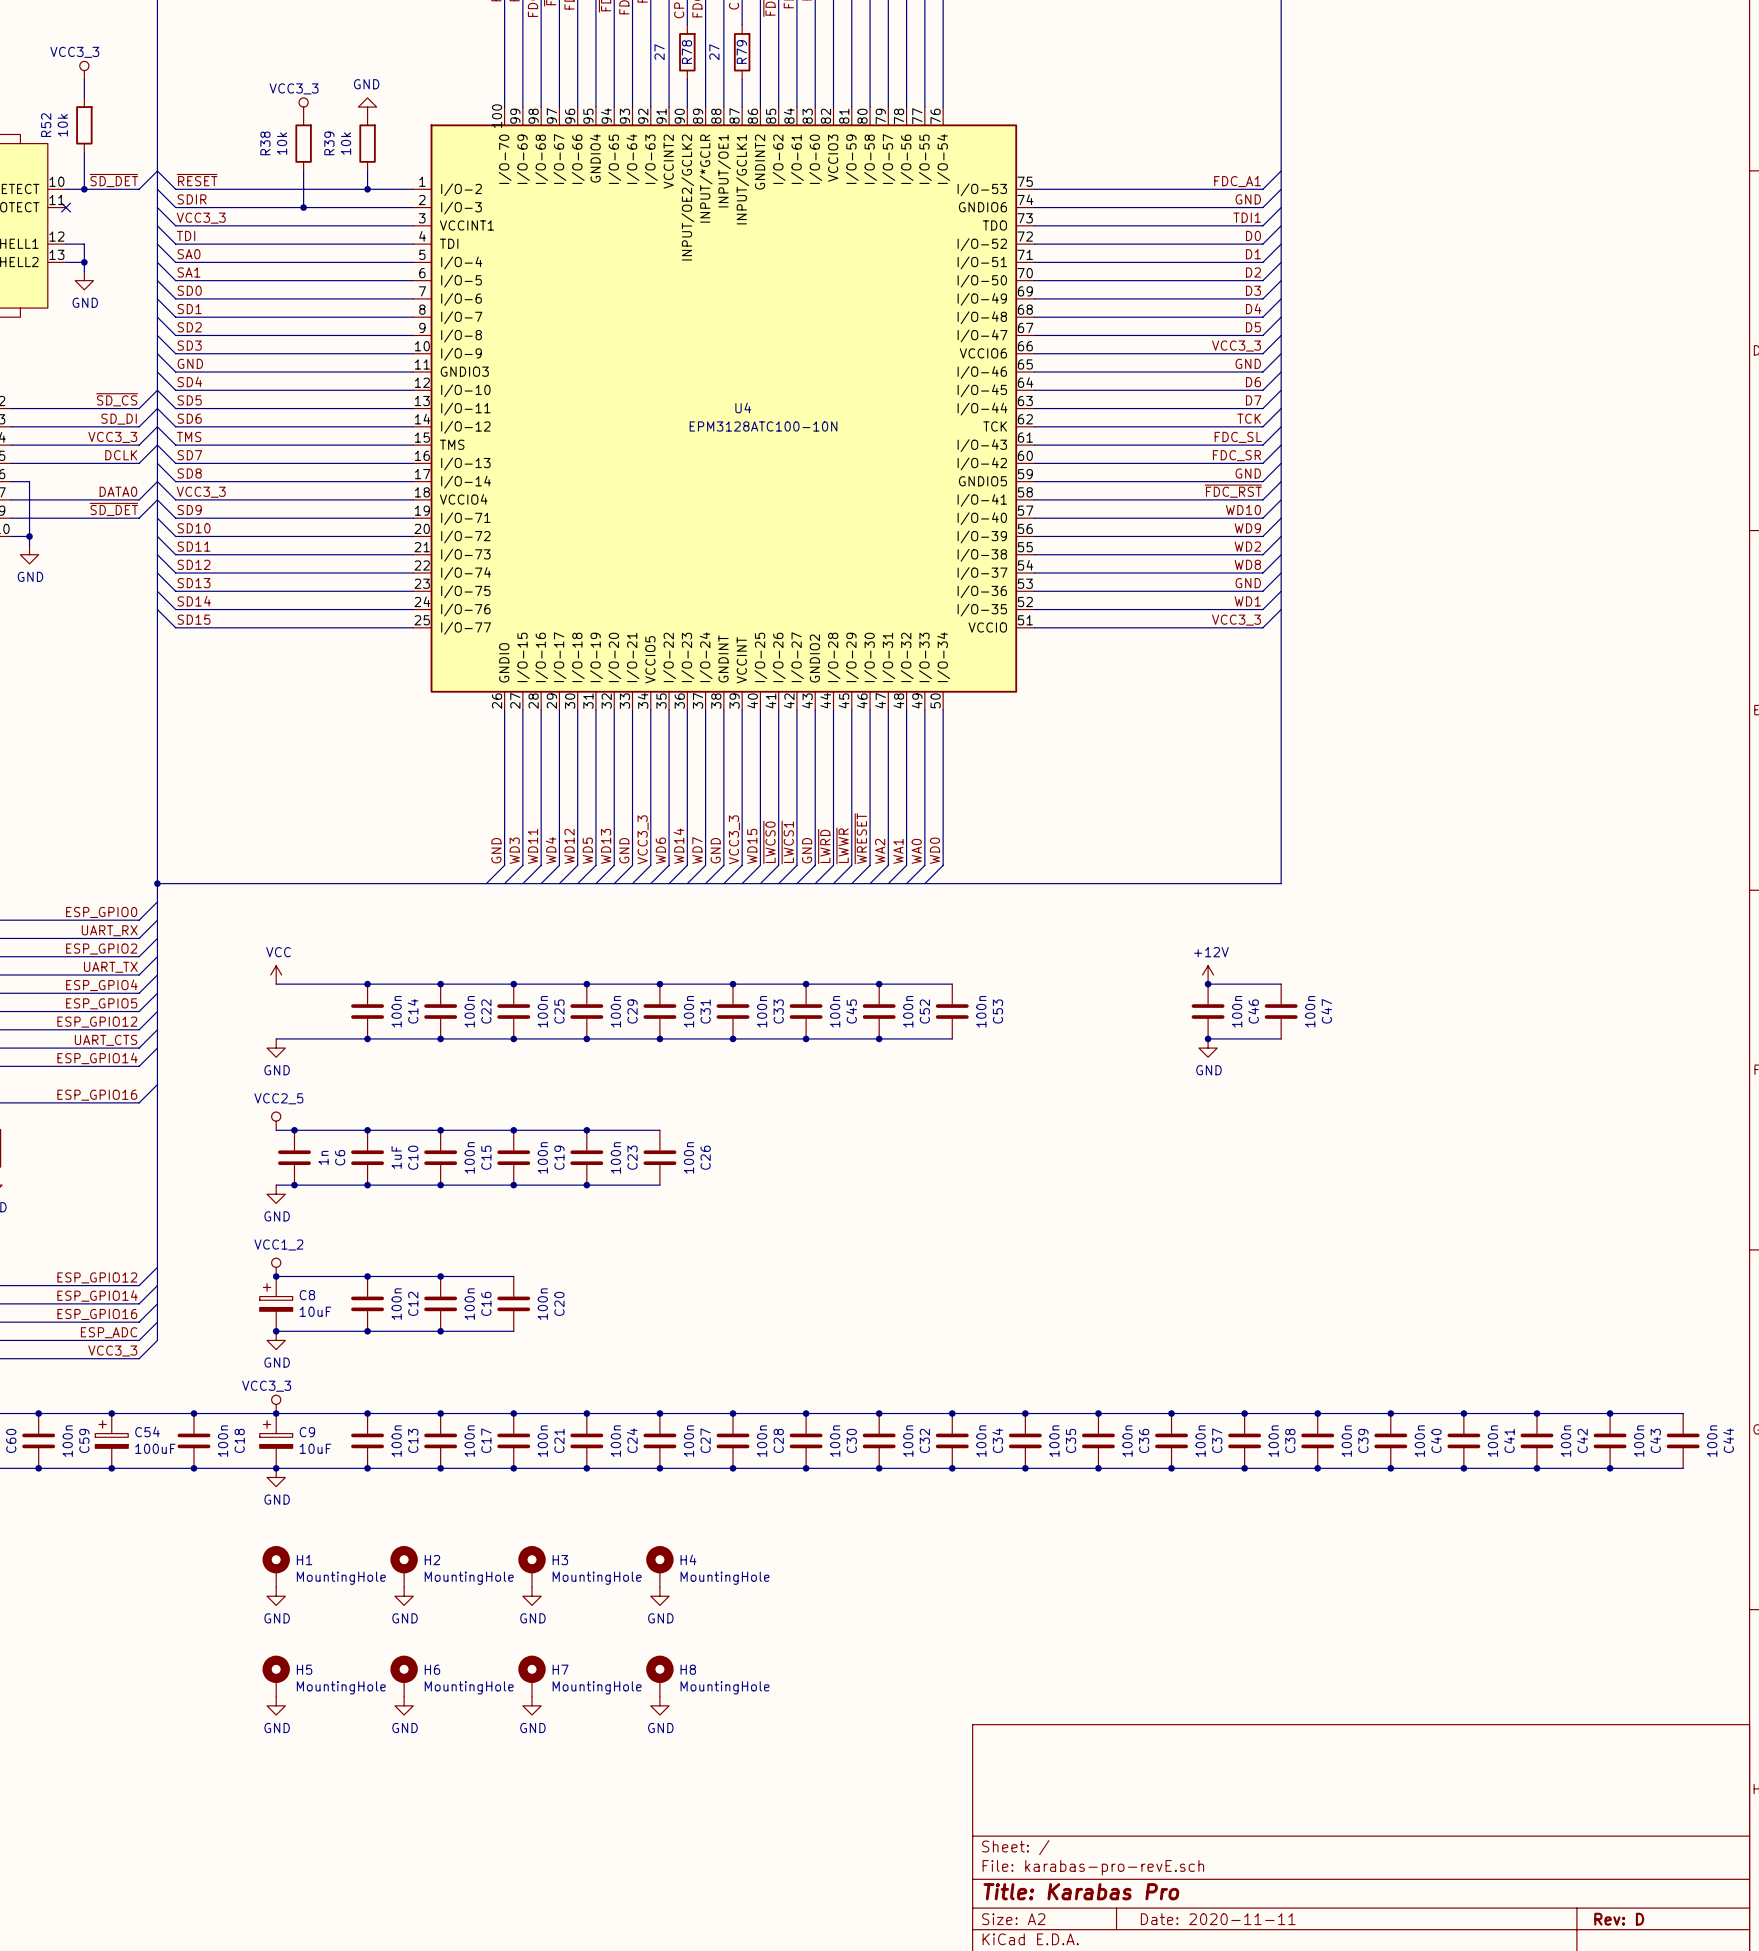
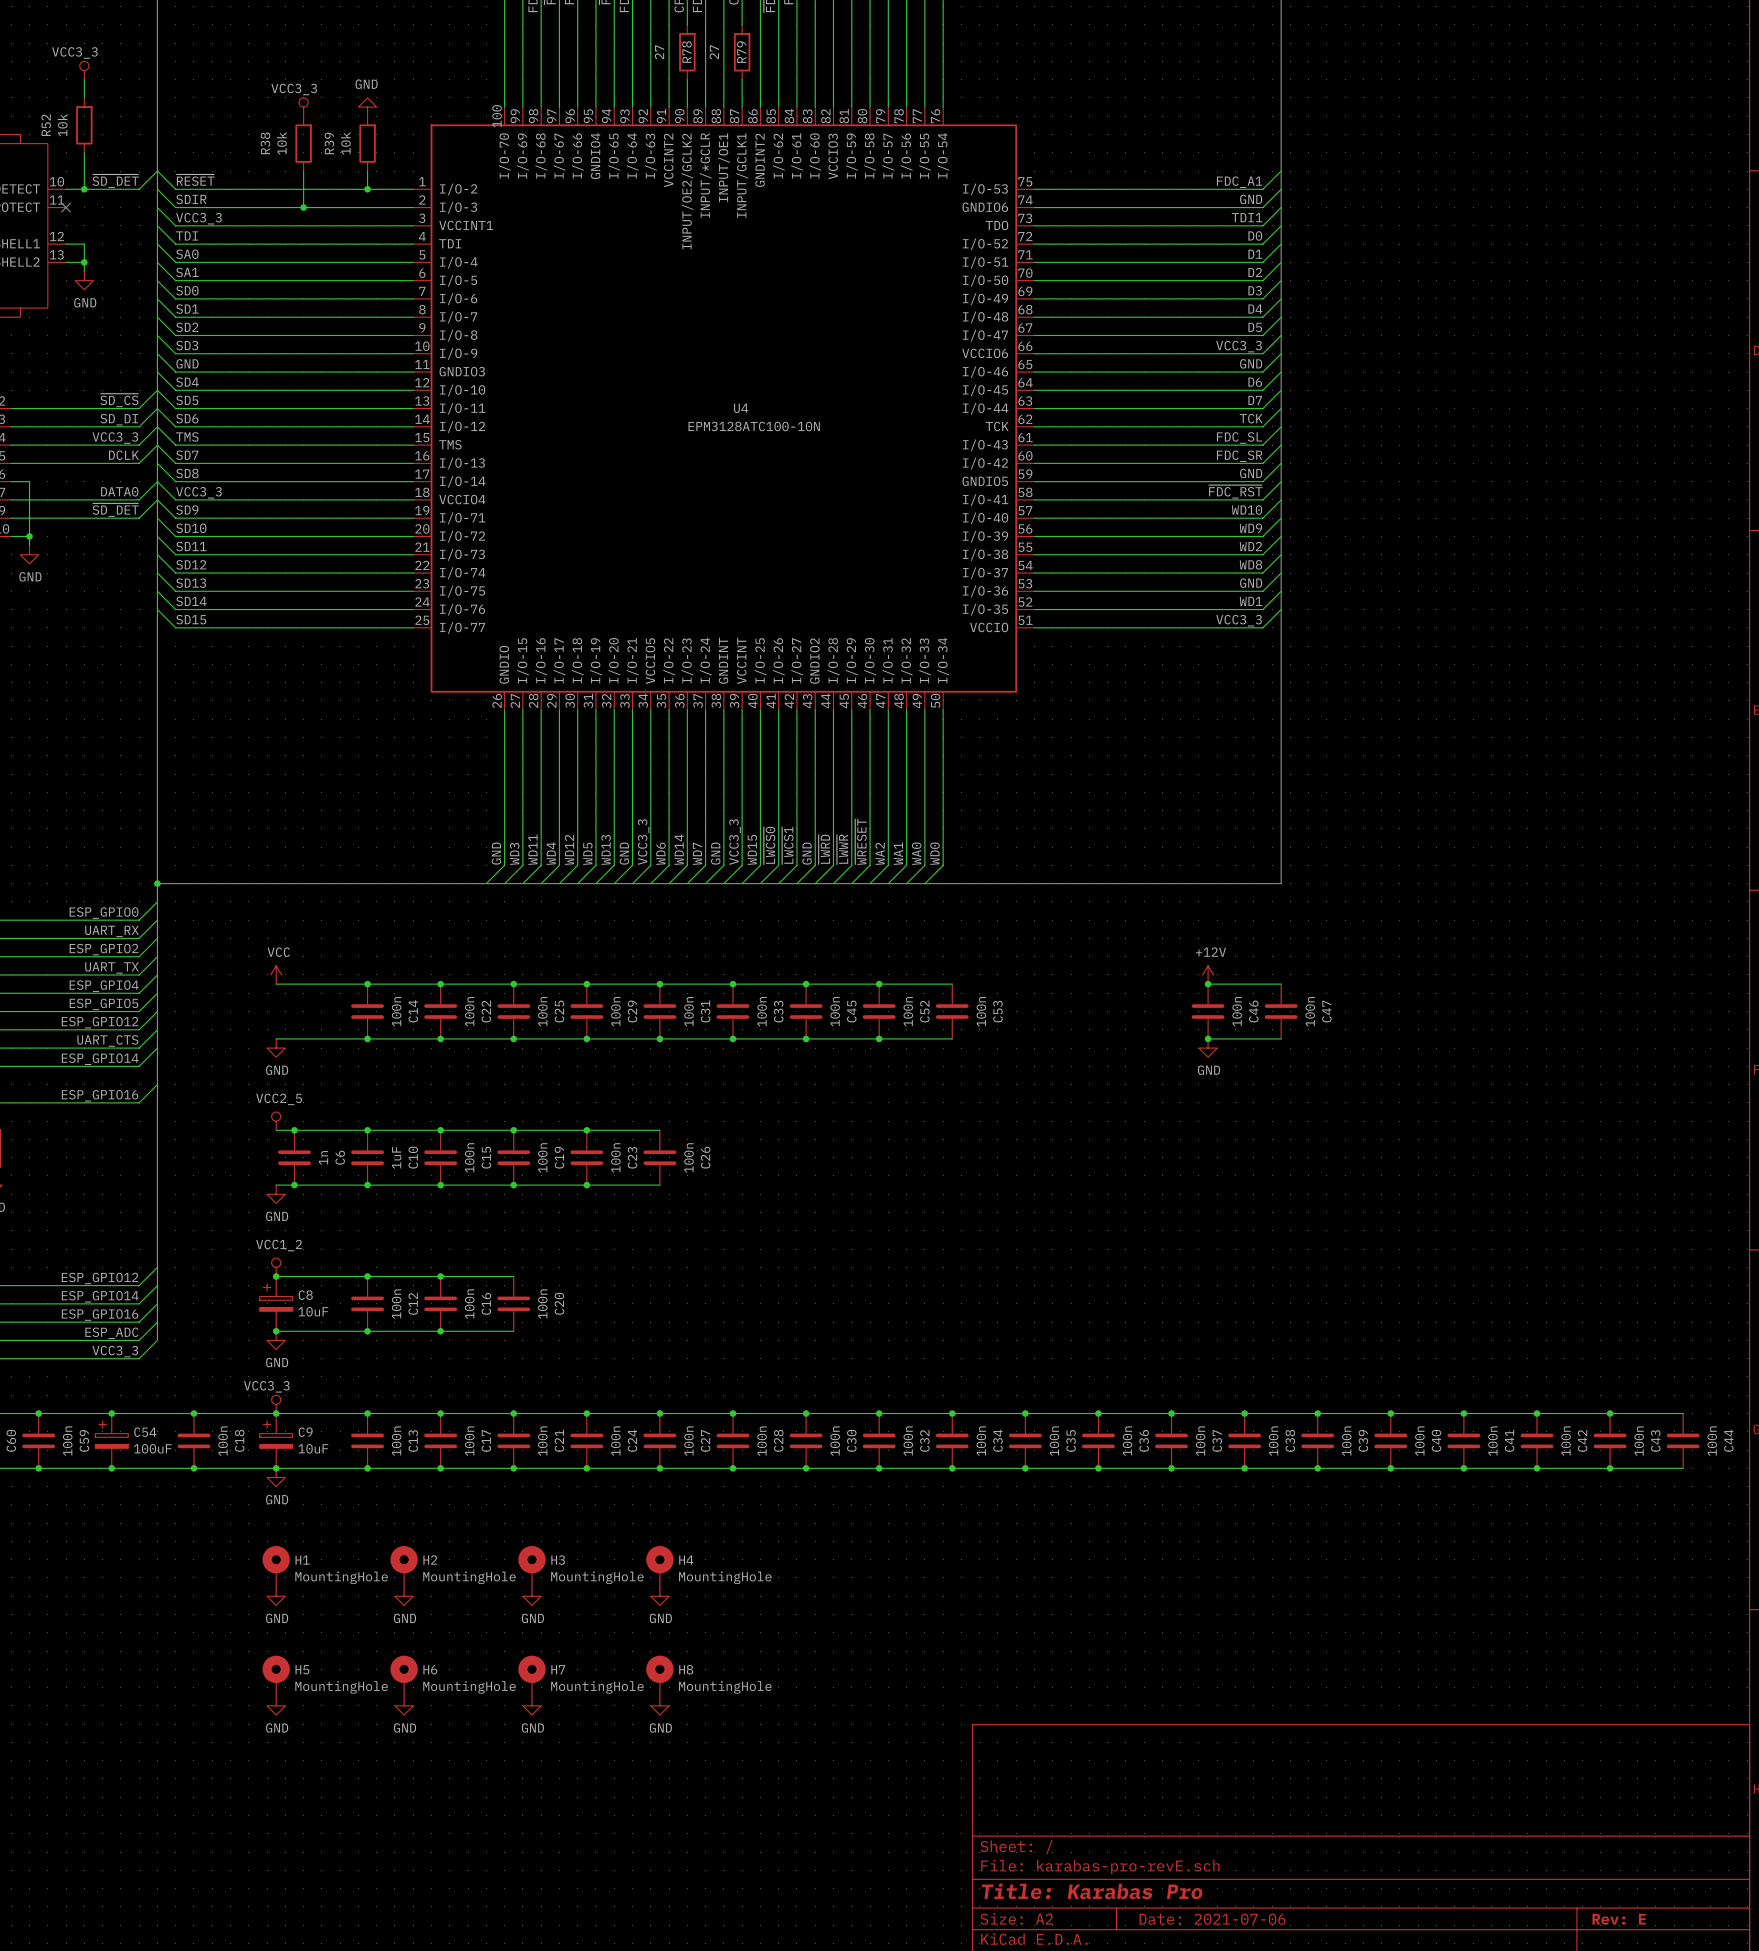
title block: Date: 2020-11-11 (1218, 1919) -> Date: 2021-07-06 (1212, 1919)
title block: Rev: D (1619, 1919) -> Rev: E (1619, 1919)

